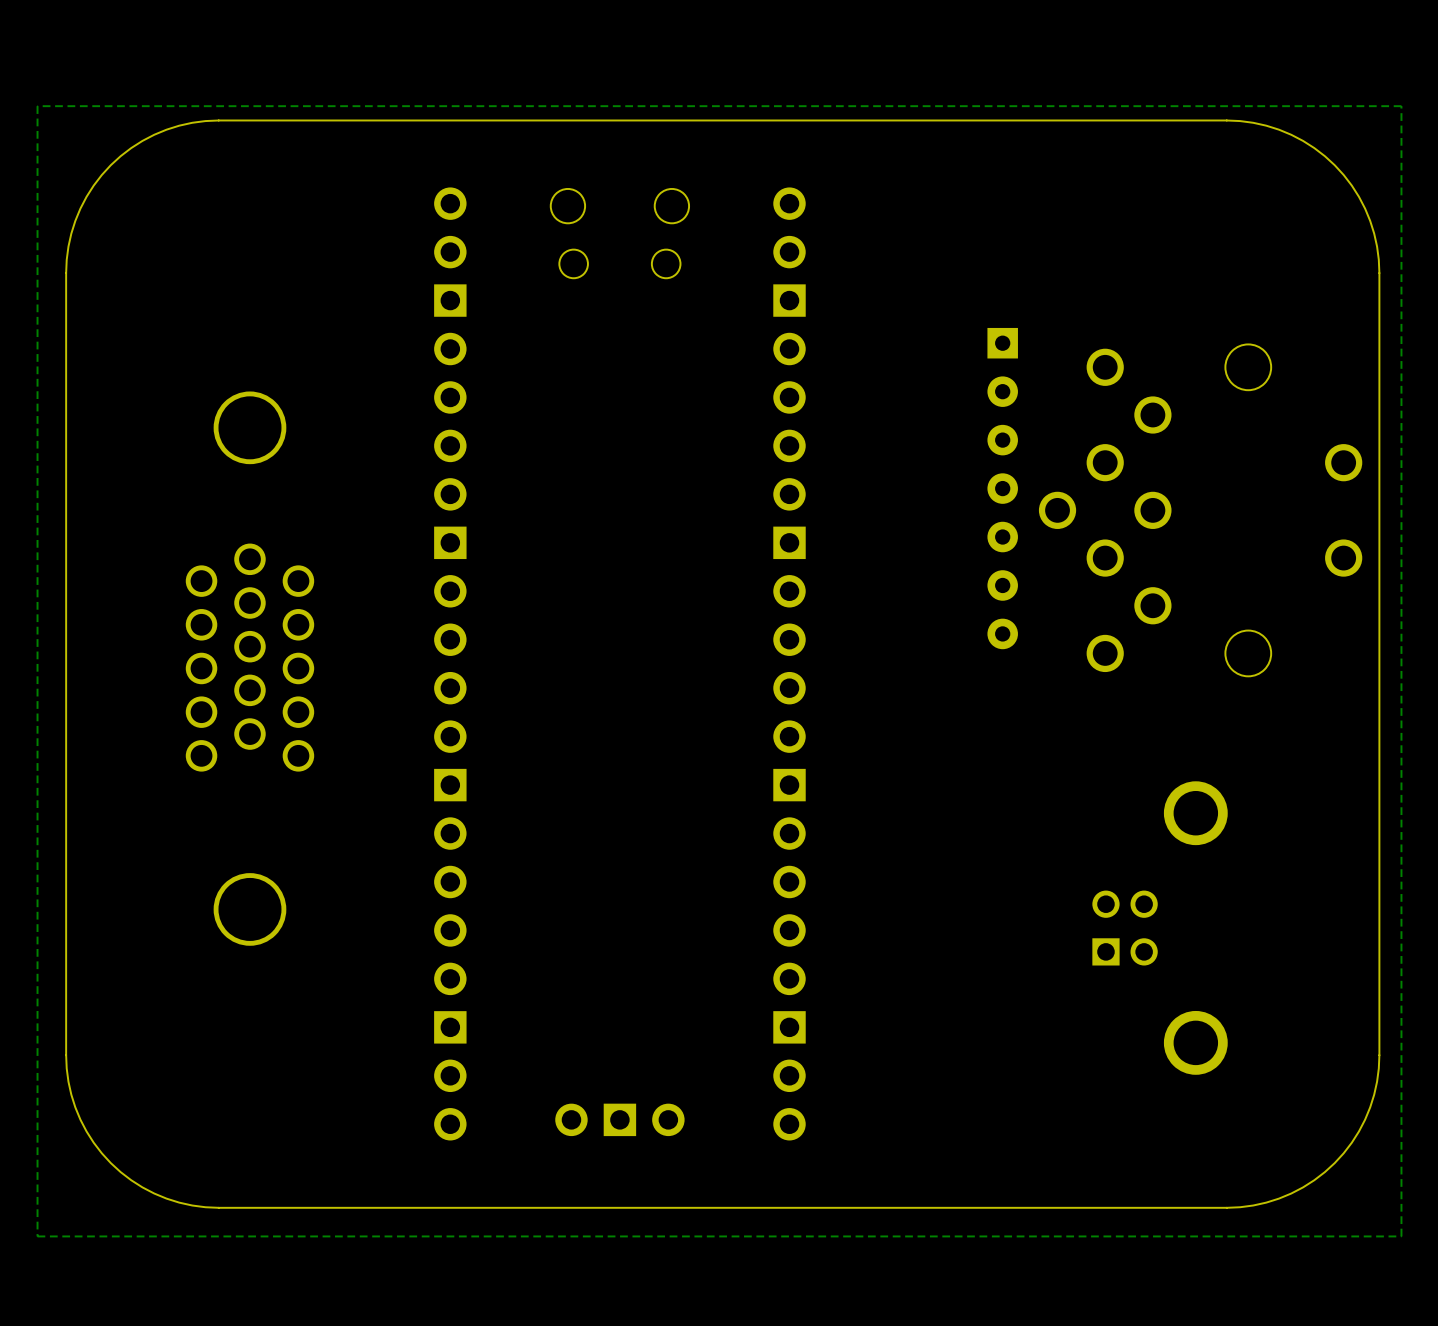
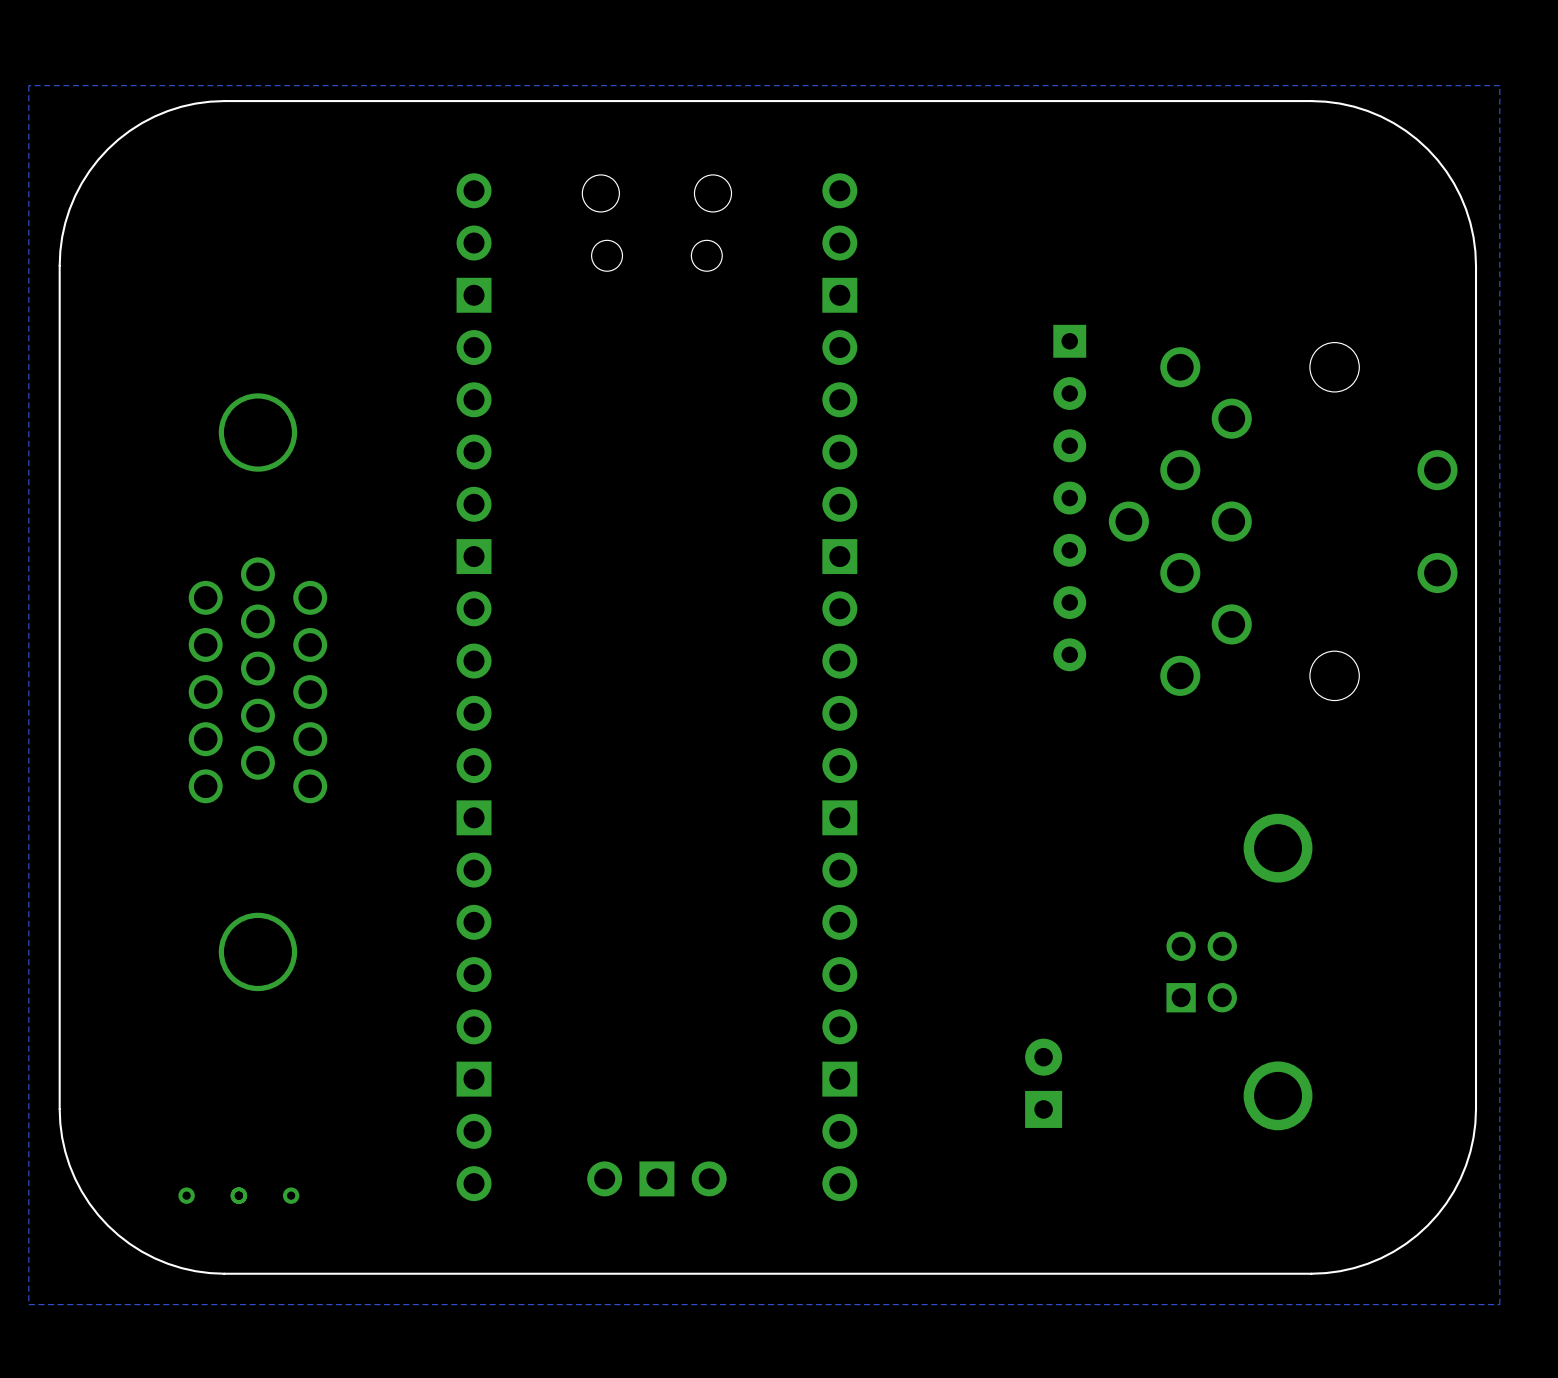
part: none -> (1043, 1083)
via: none -> (186, 1195)
via: none -> (238, 1195)
via: none -> (291, 1195)

